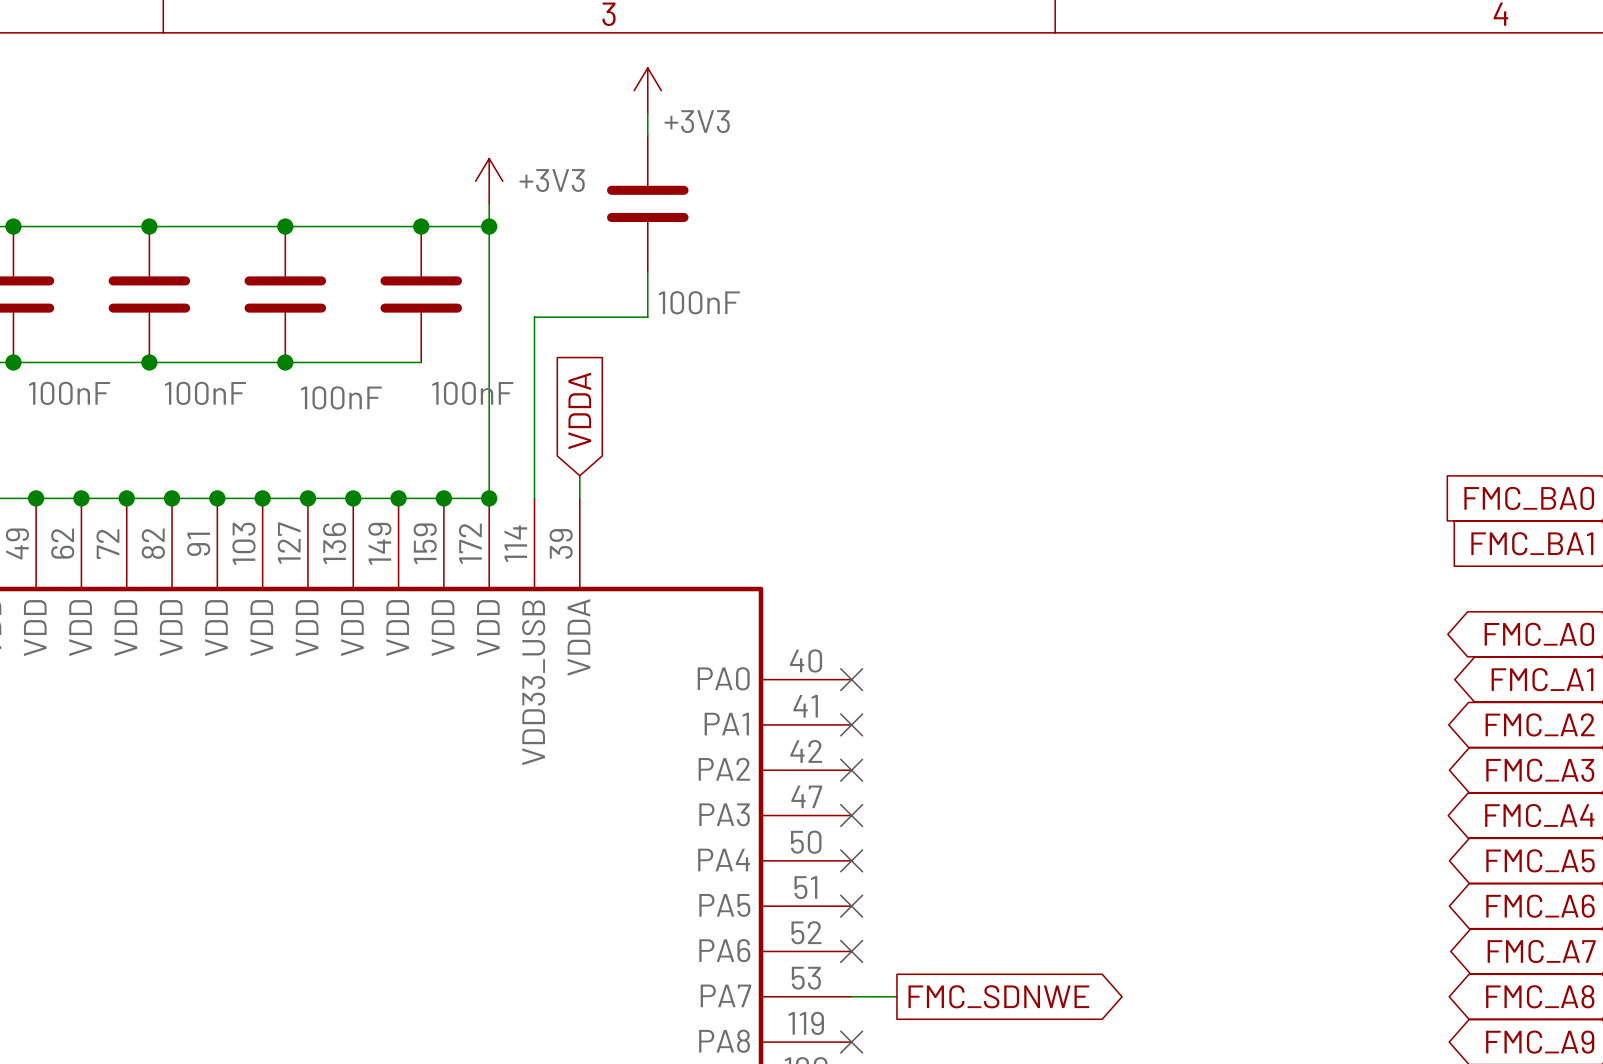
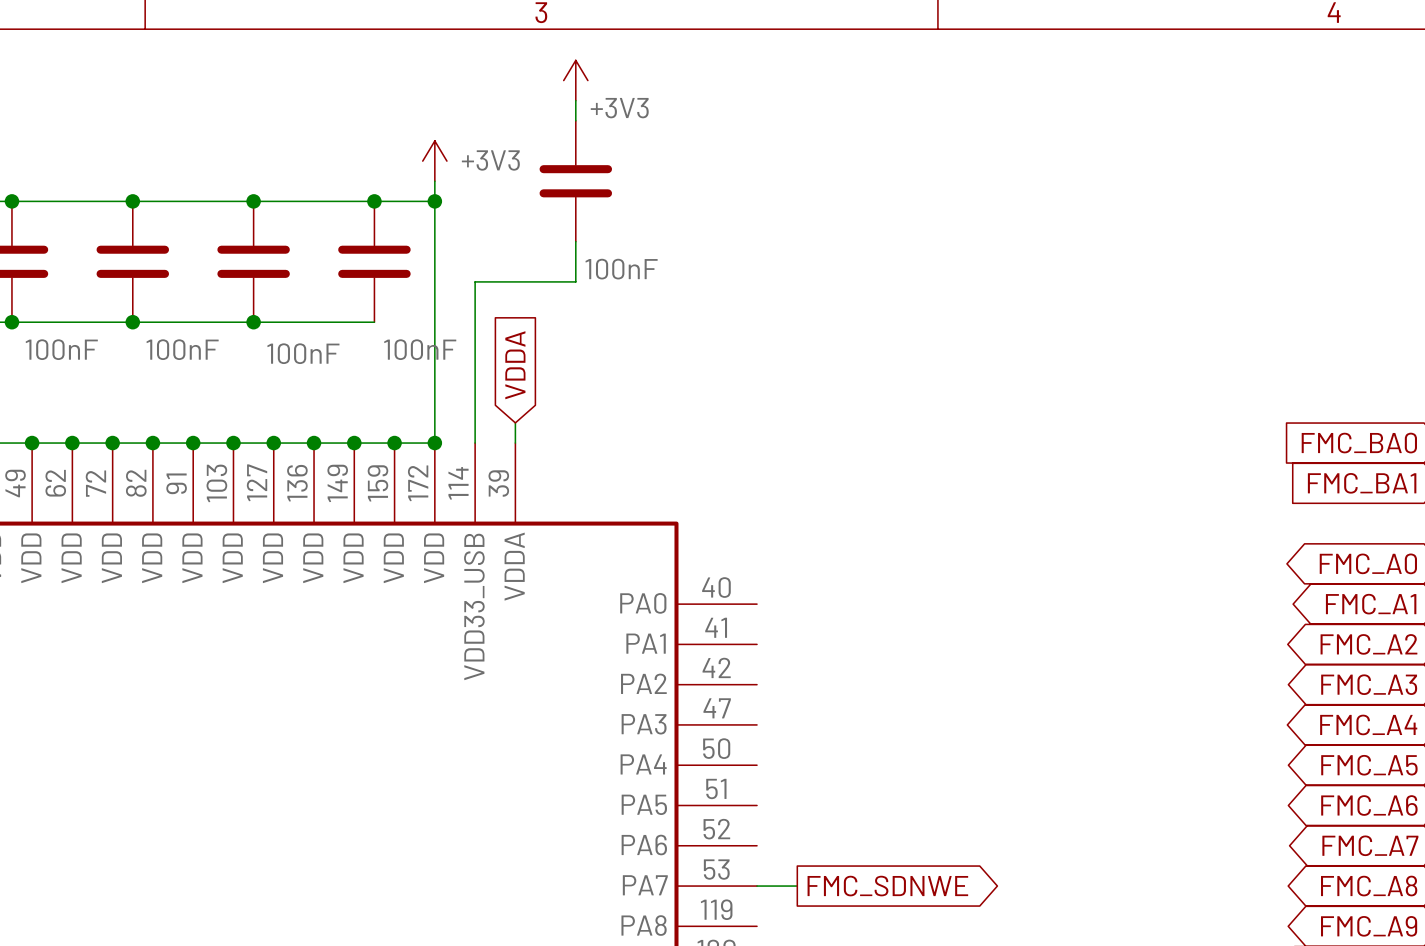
no-connect mark: (851, 679) -> none
no-connect mark: (851, 724) -> none
no-connect mark: (851, 770) -> none
no-connect mark: (851, 815) -> none
no-connect mark: (851, 860) -> none
no-connect mark: (851, 906) -> none
no-connect mark: (851, 951) -> none
no-connect mark: (851, 1042) -> none

